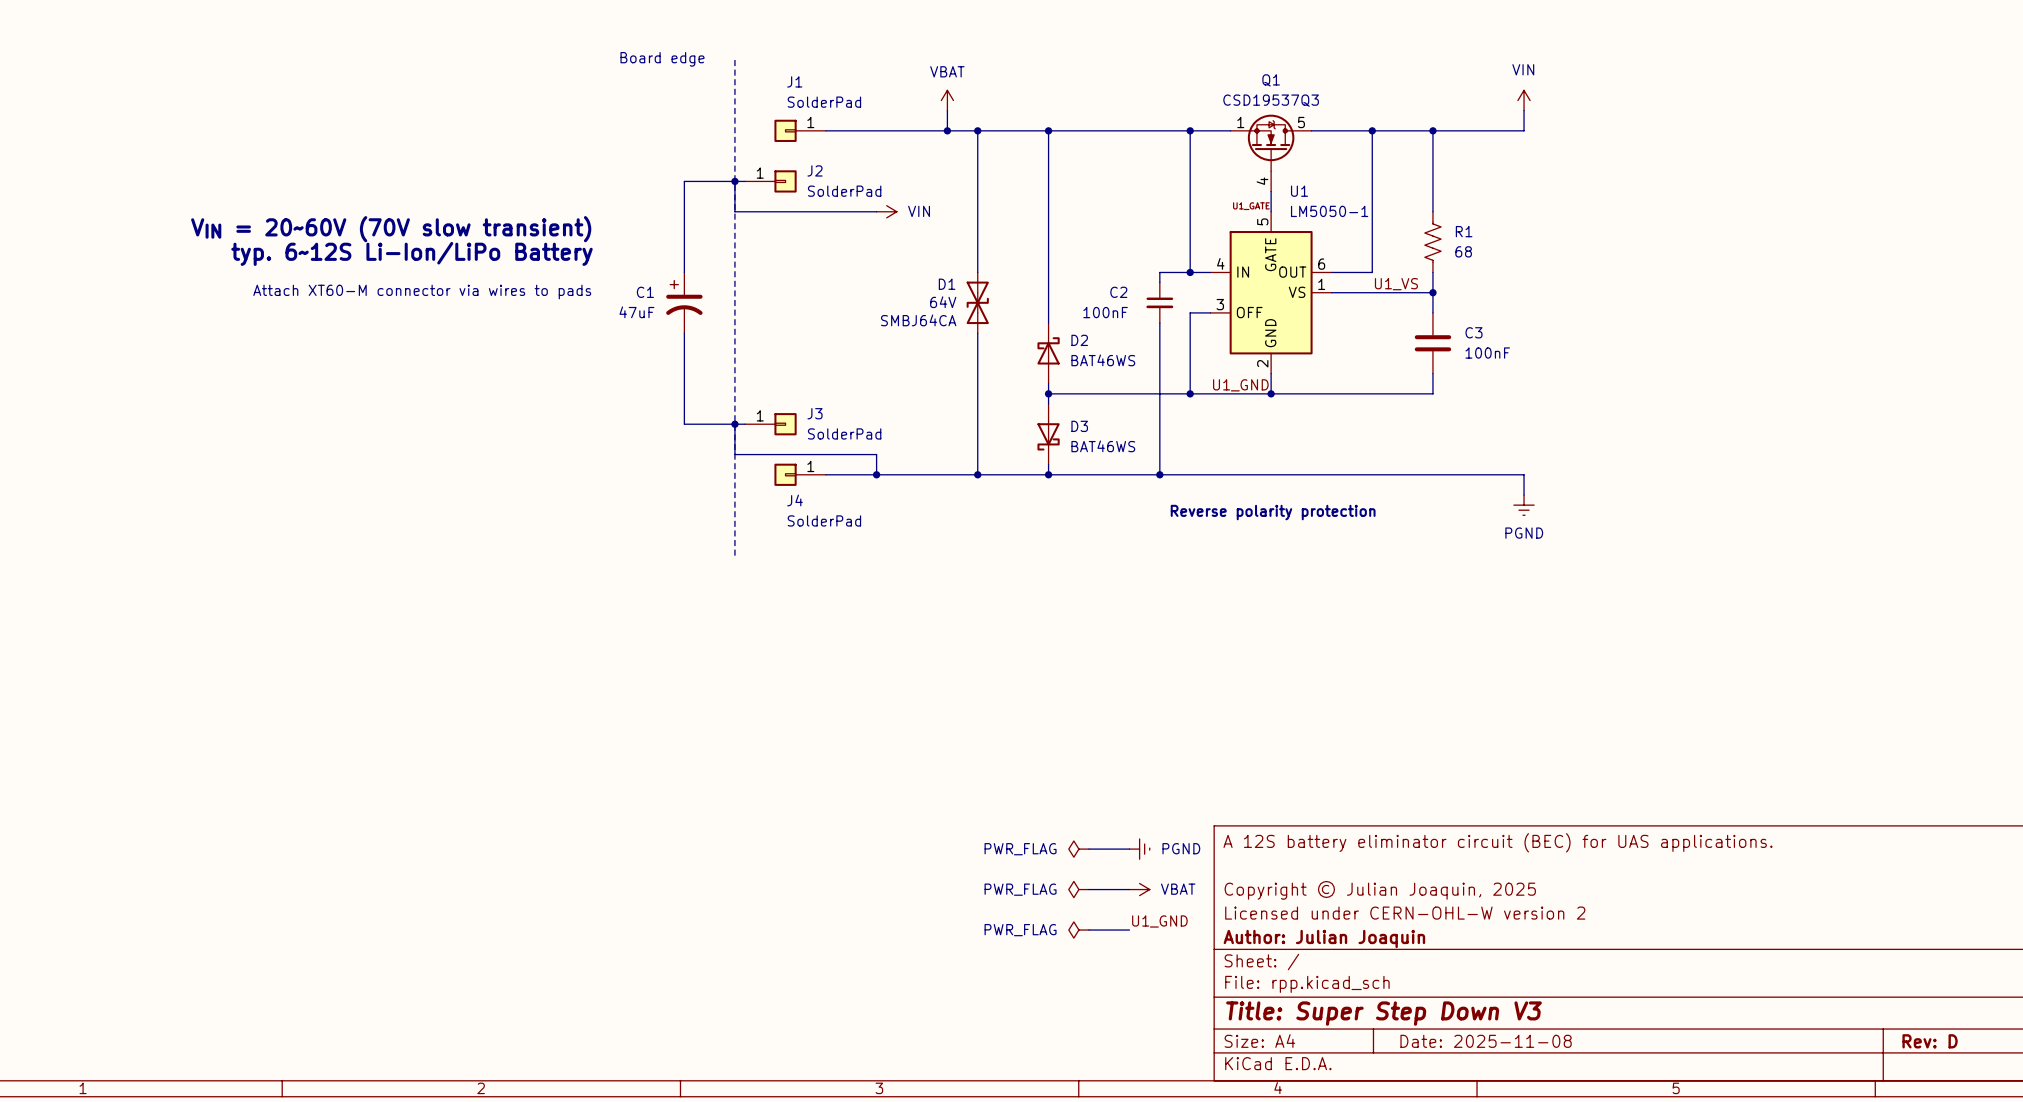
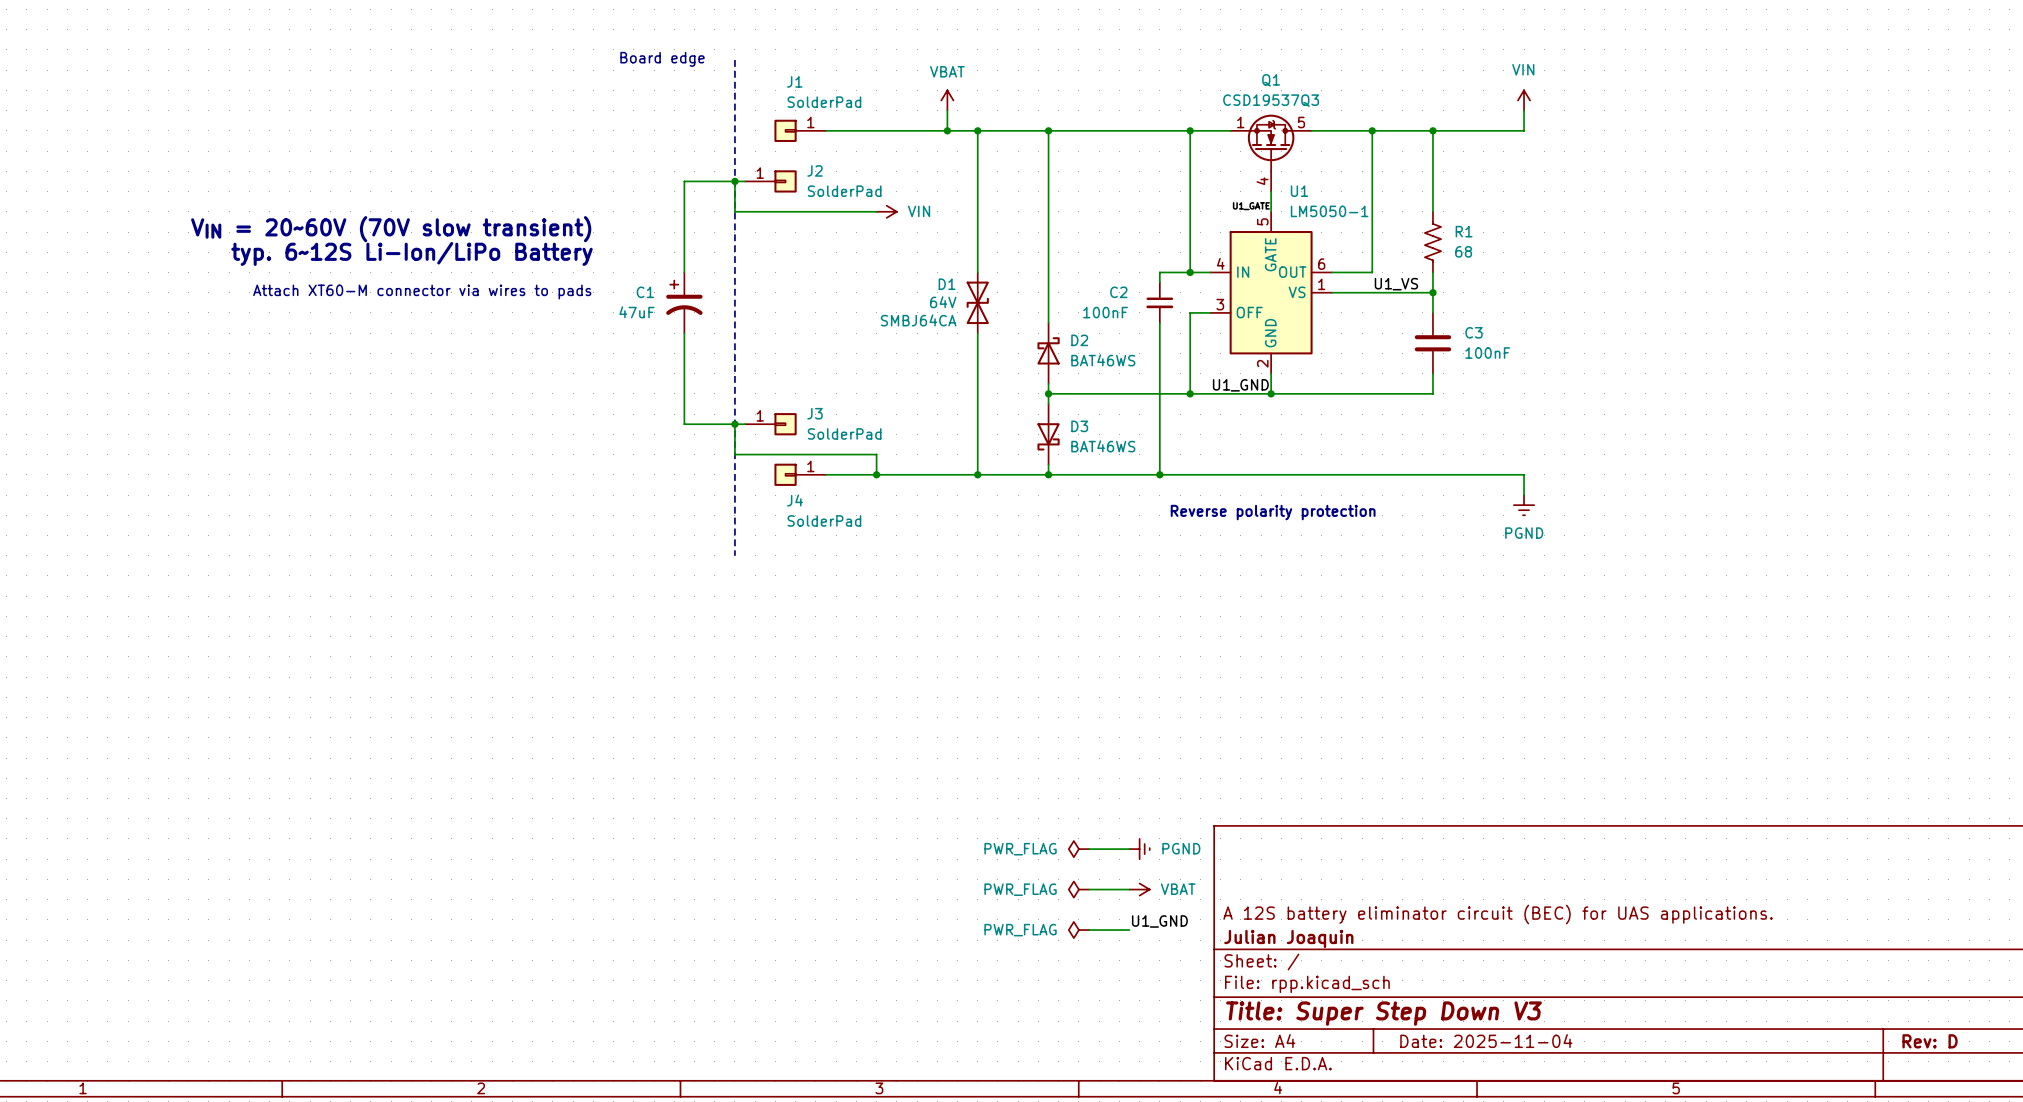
title block: A 12S battery eliminator circuit (BEC) for UAS applications. (1498, 842) -> none
title block: Copyright © Julian Joaquin, 2025 (1380, 890) -> none
title block: Licensed under CERN-OHL-W version 2 (1405, 913) -> A 12S battery eliminator circuit (BEC) for UAS applications. (1498, 914)
title block: Author: Julian Joaquin (1324, 938) -> Julian Joaquin (1288, 938)
title block: Date: 2025-11-08 (1486, 1041) -> Date: 2025-11-04 (1486, 1041)

